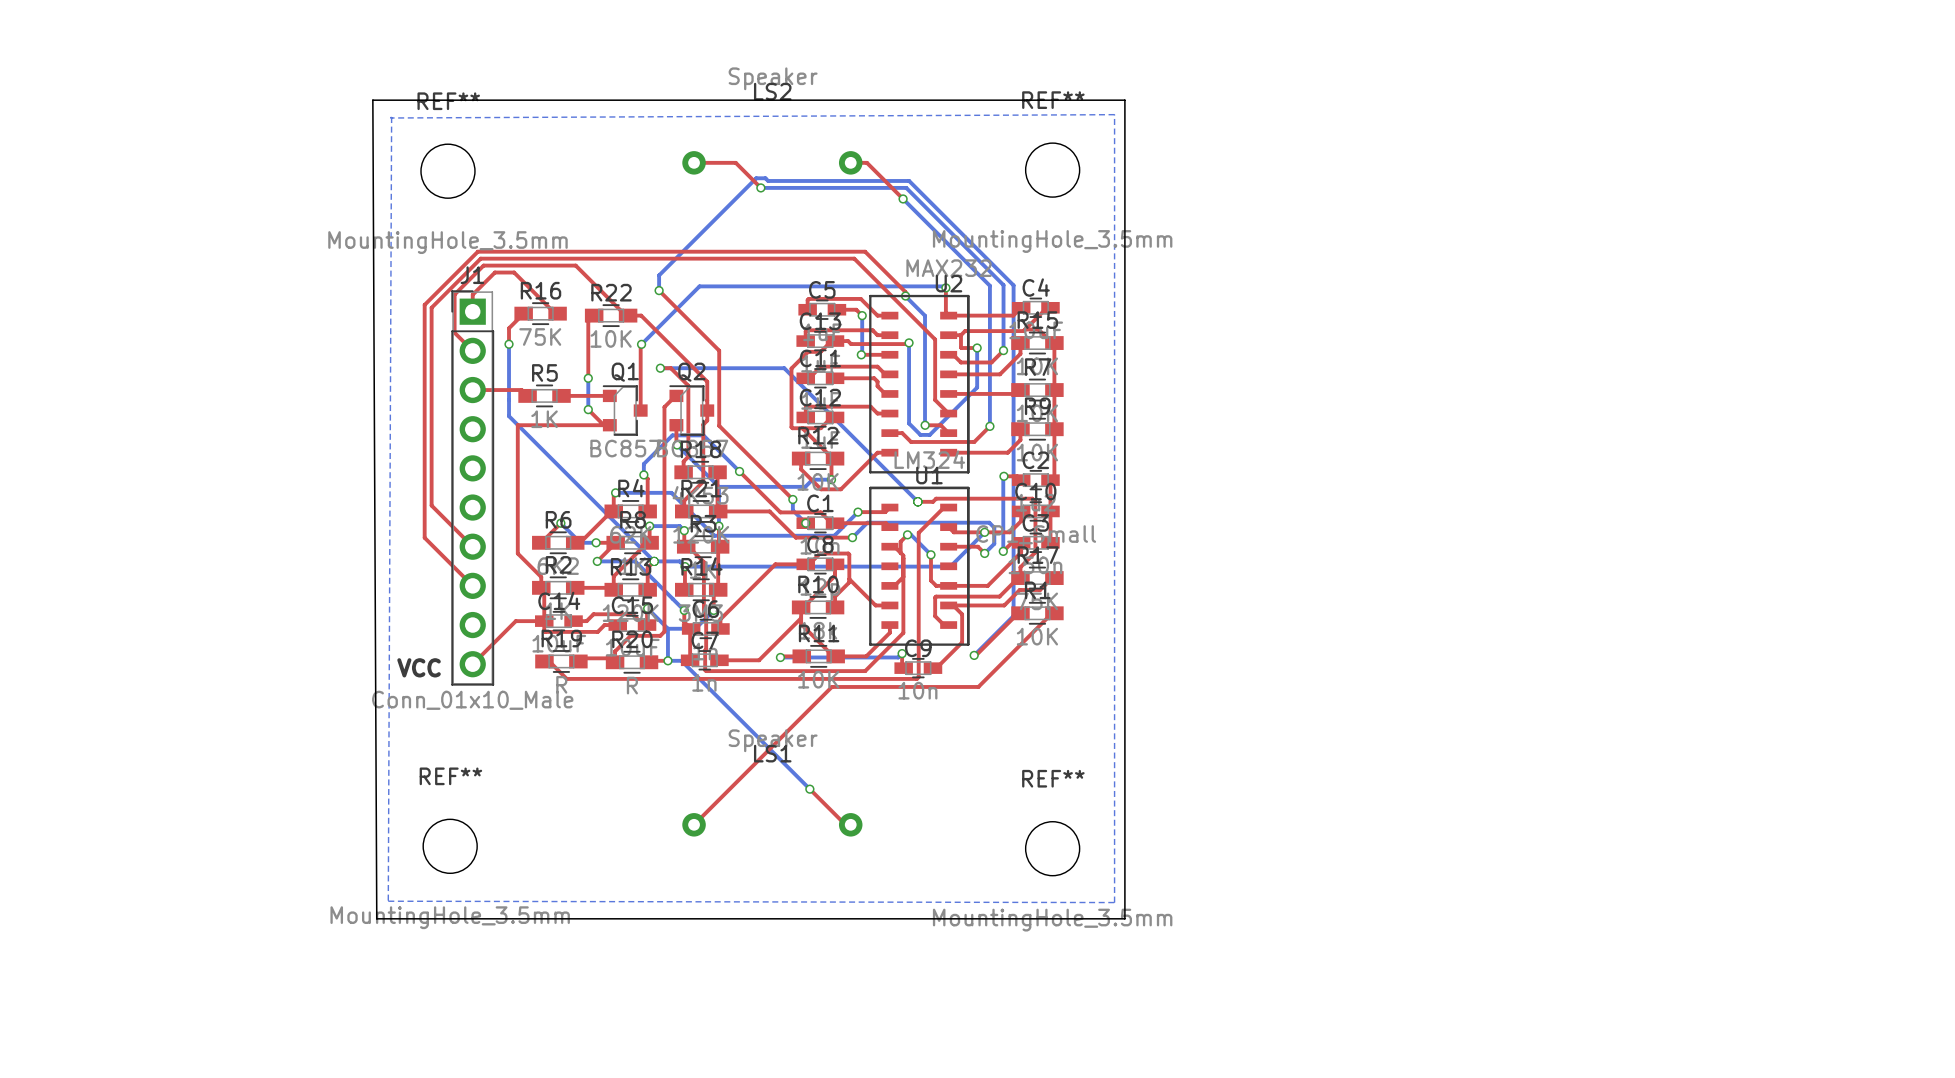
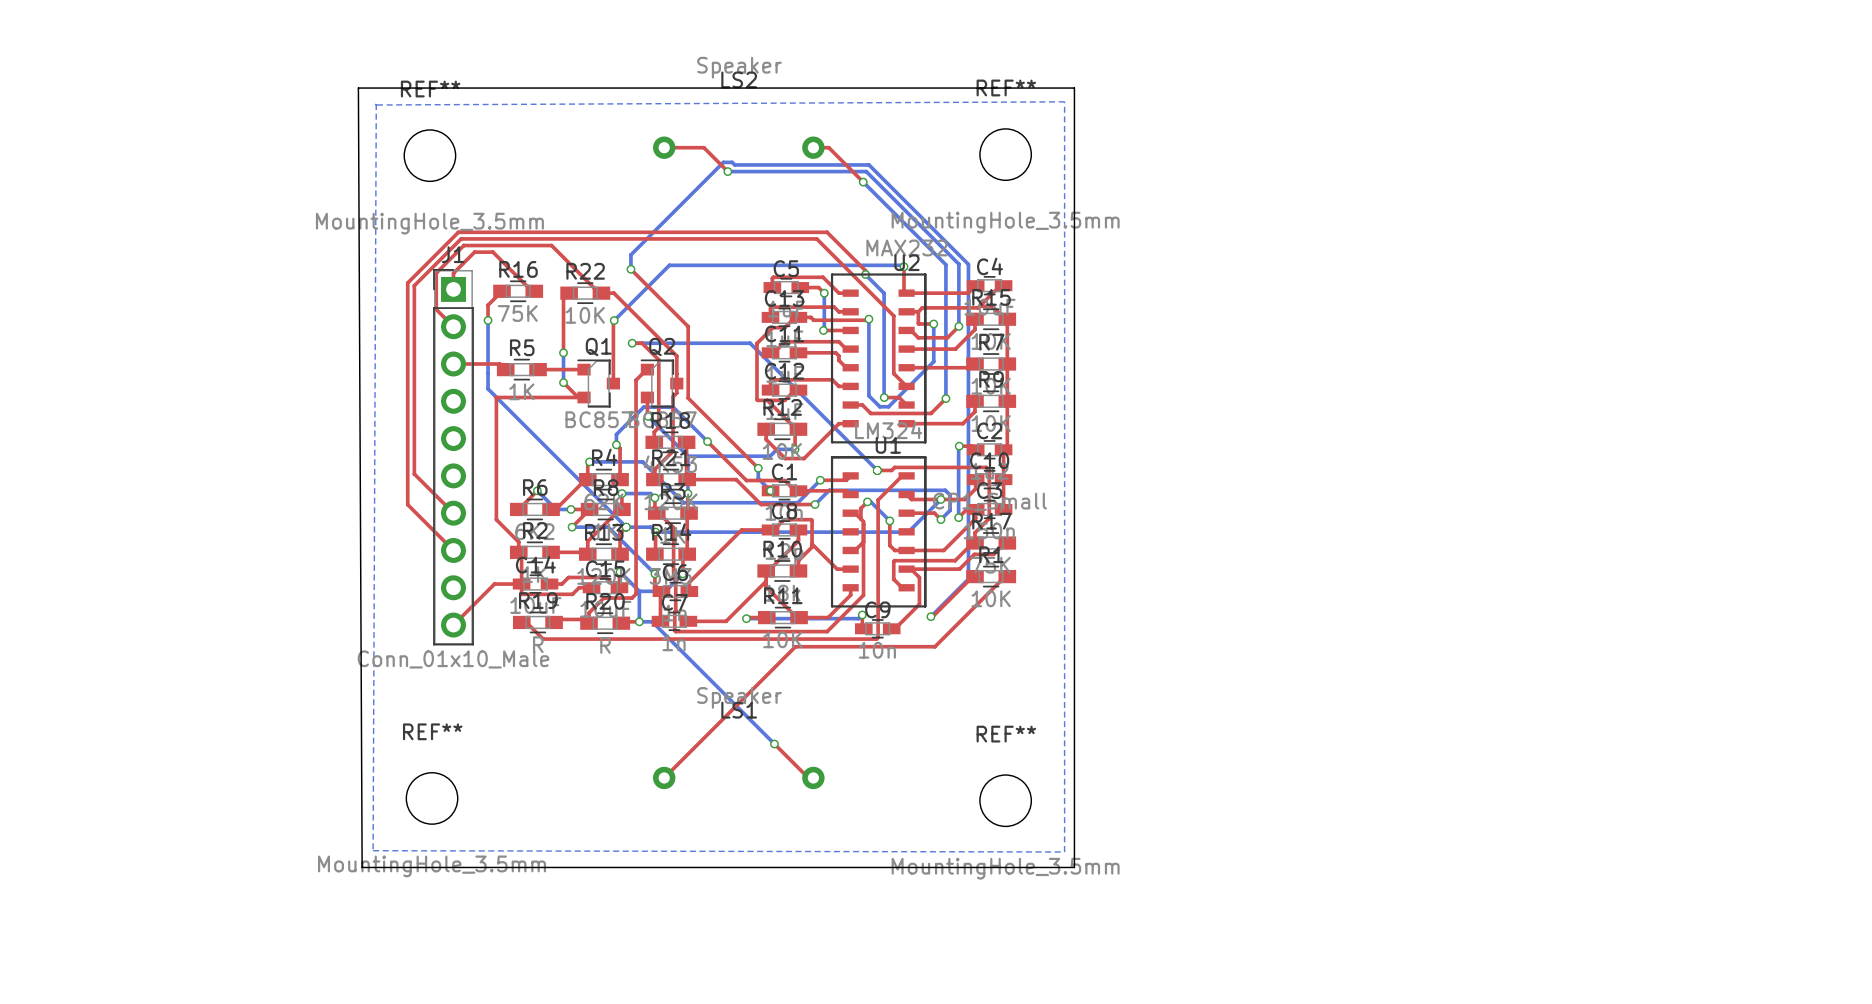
text: VCC (419, 667) -> none

